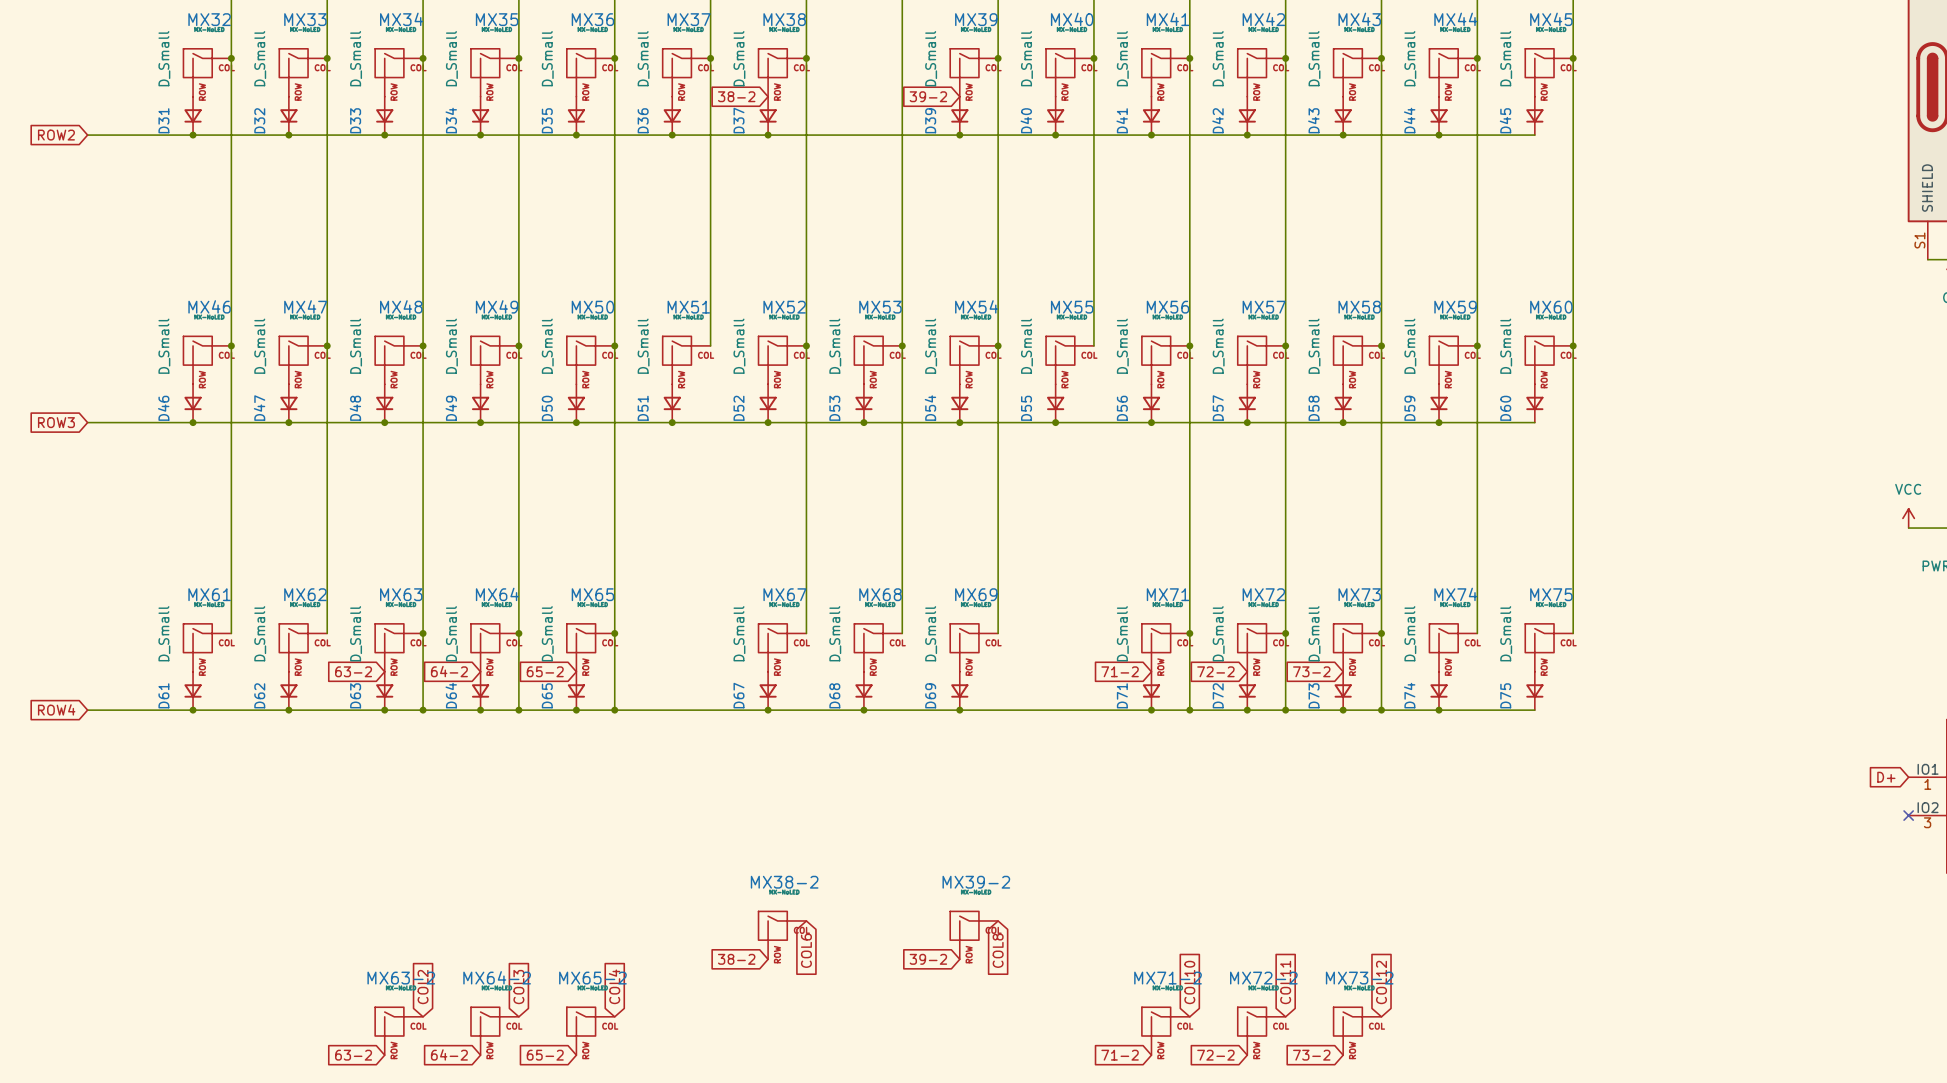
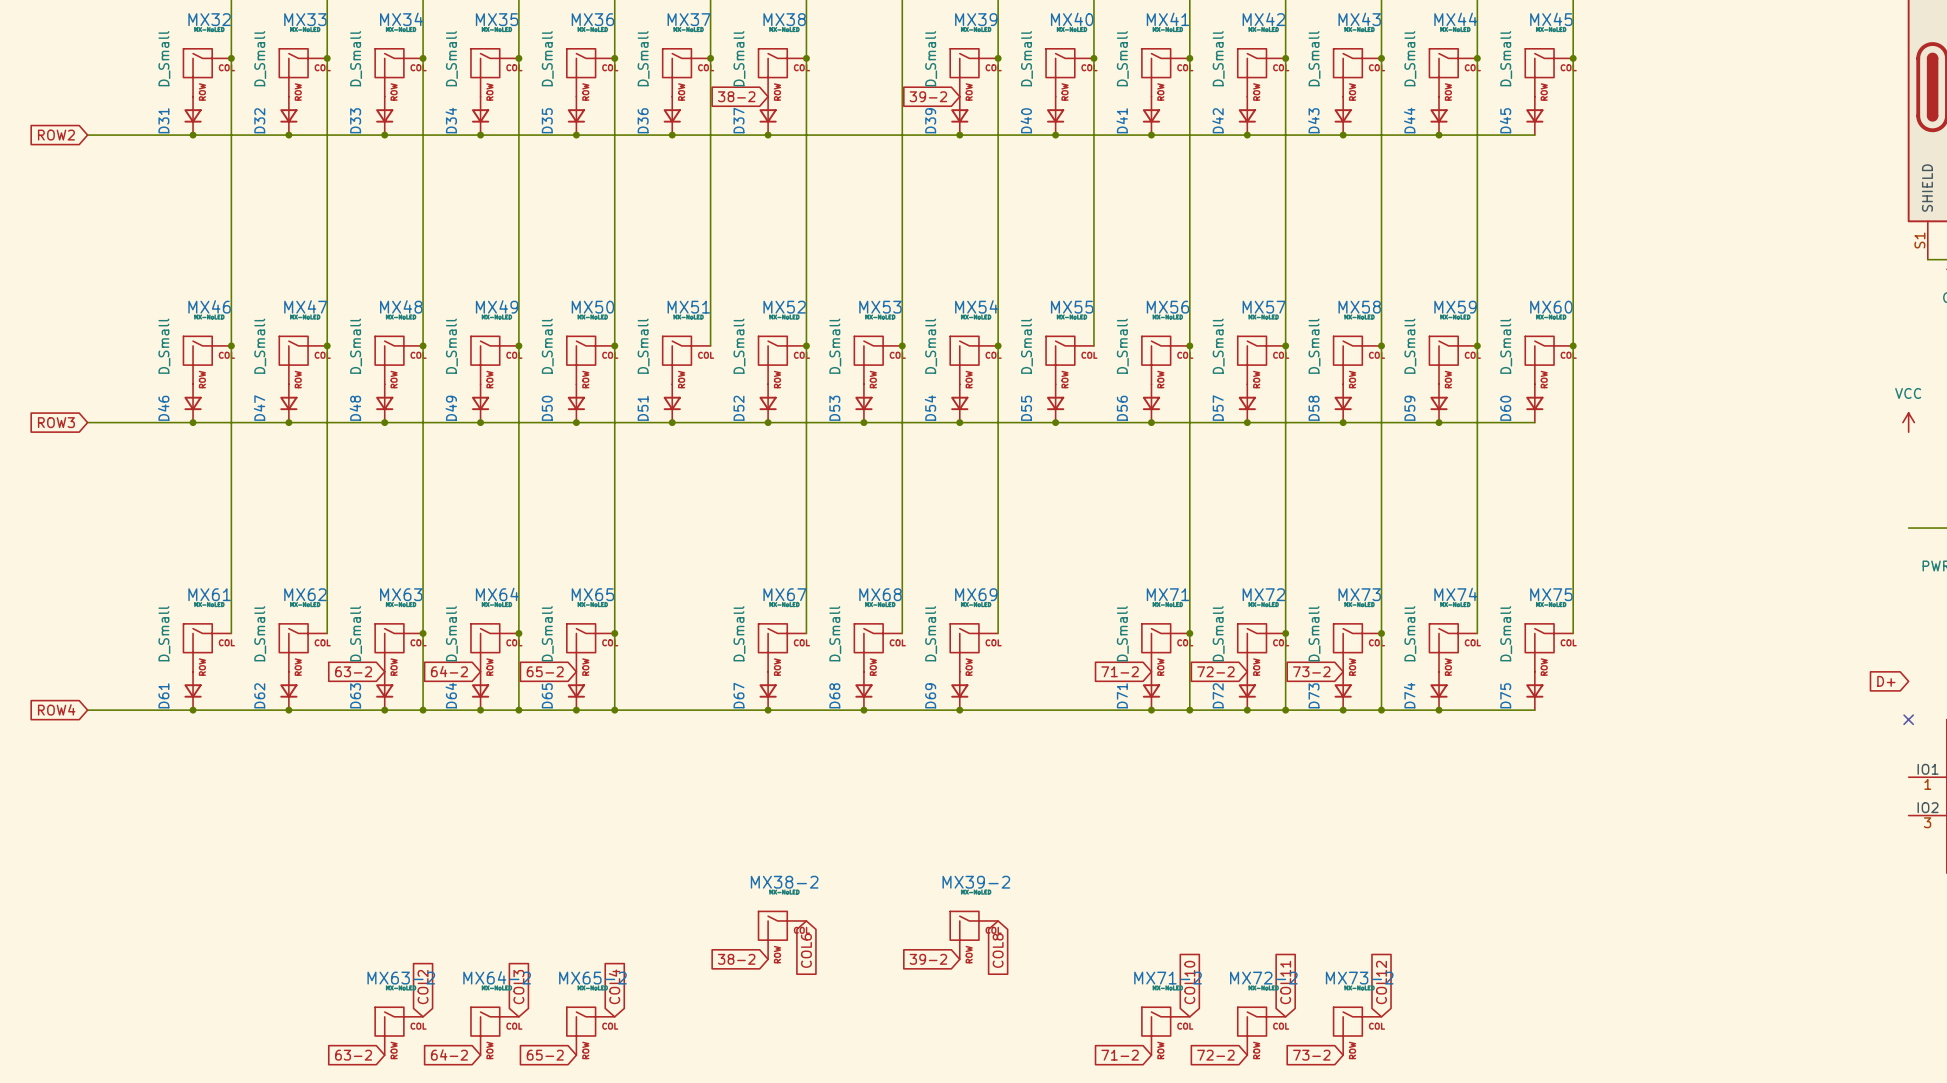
power symbol: none -> VCC (1908, 422)
power symbol: VCC (1908, 518) -> none
no-connect mark: none -> (1908, 719)
global label position: D+ (1886, 777) -> D+ (1886, 681)
no-connect mark: (1908, 815) -> none

